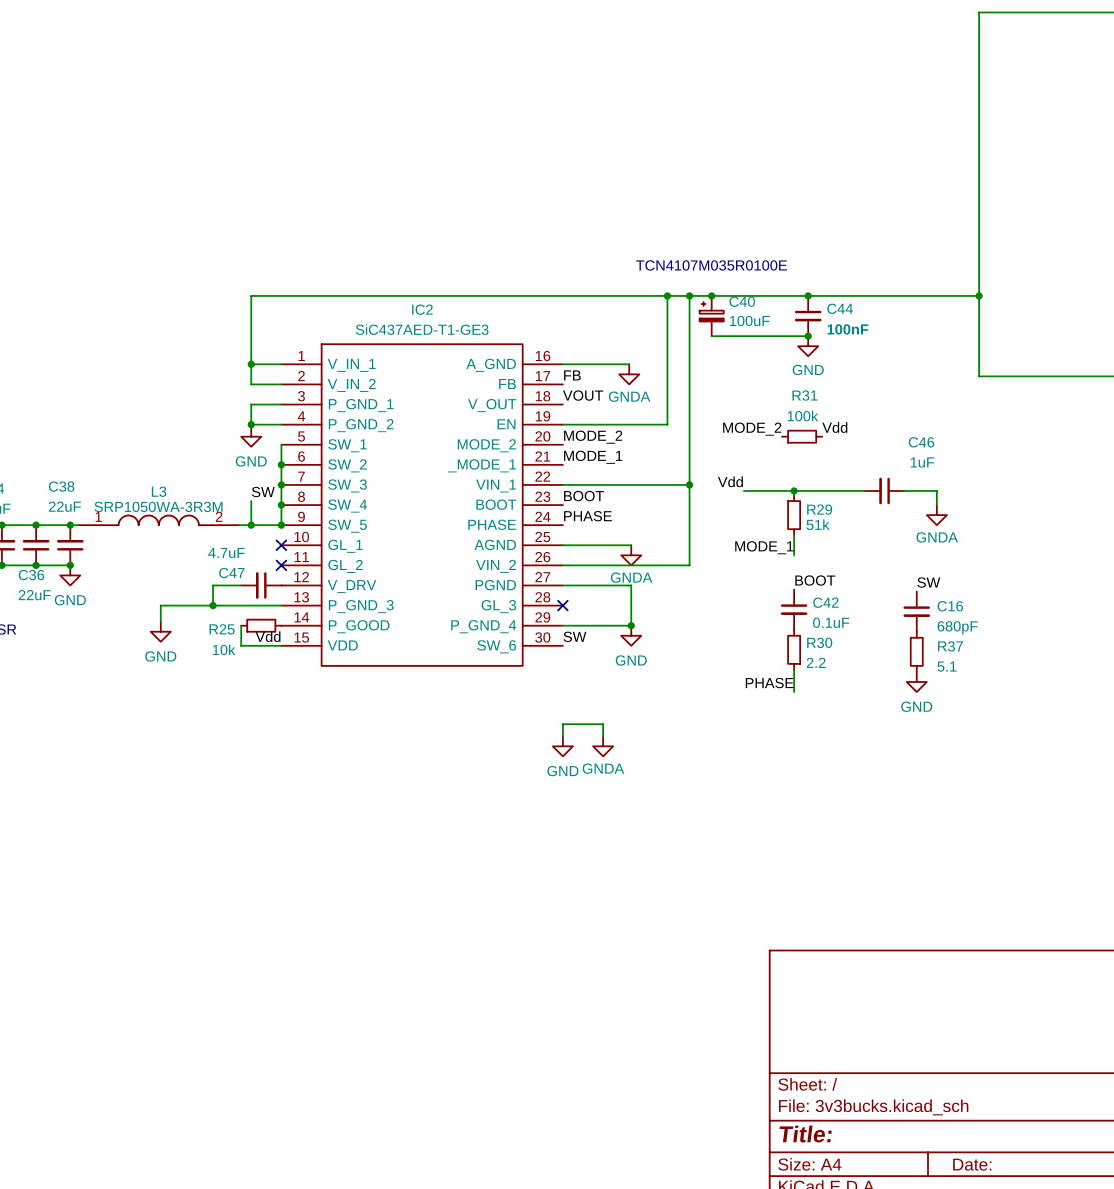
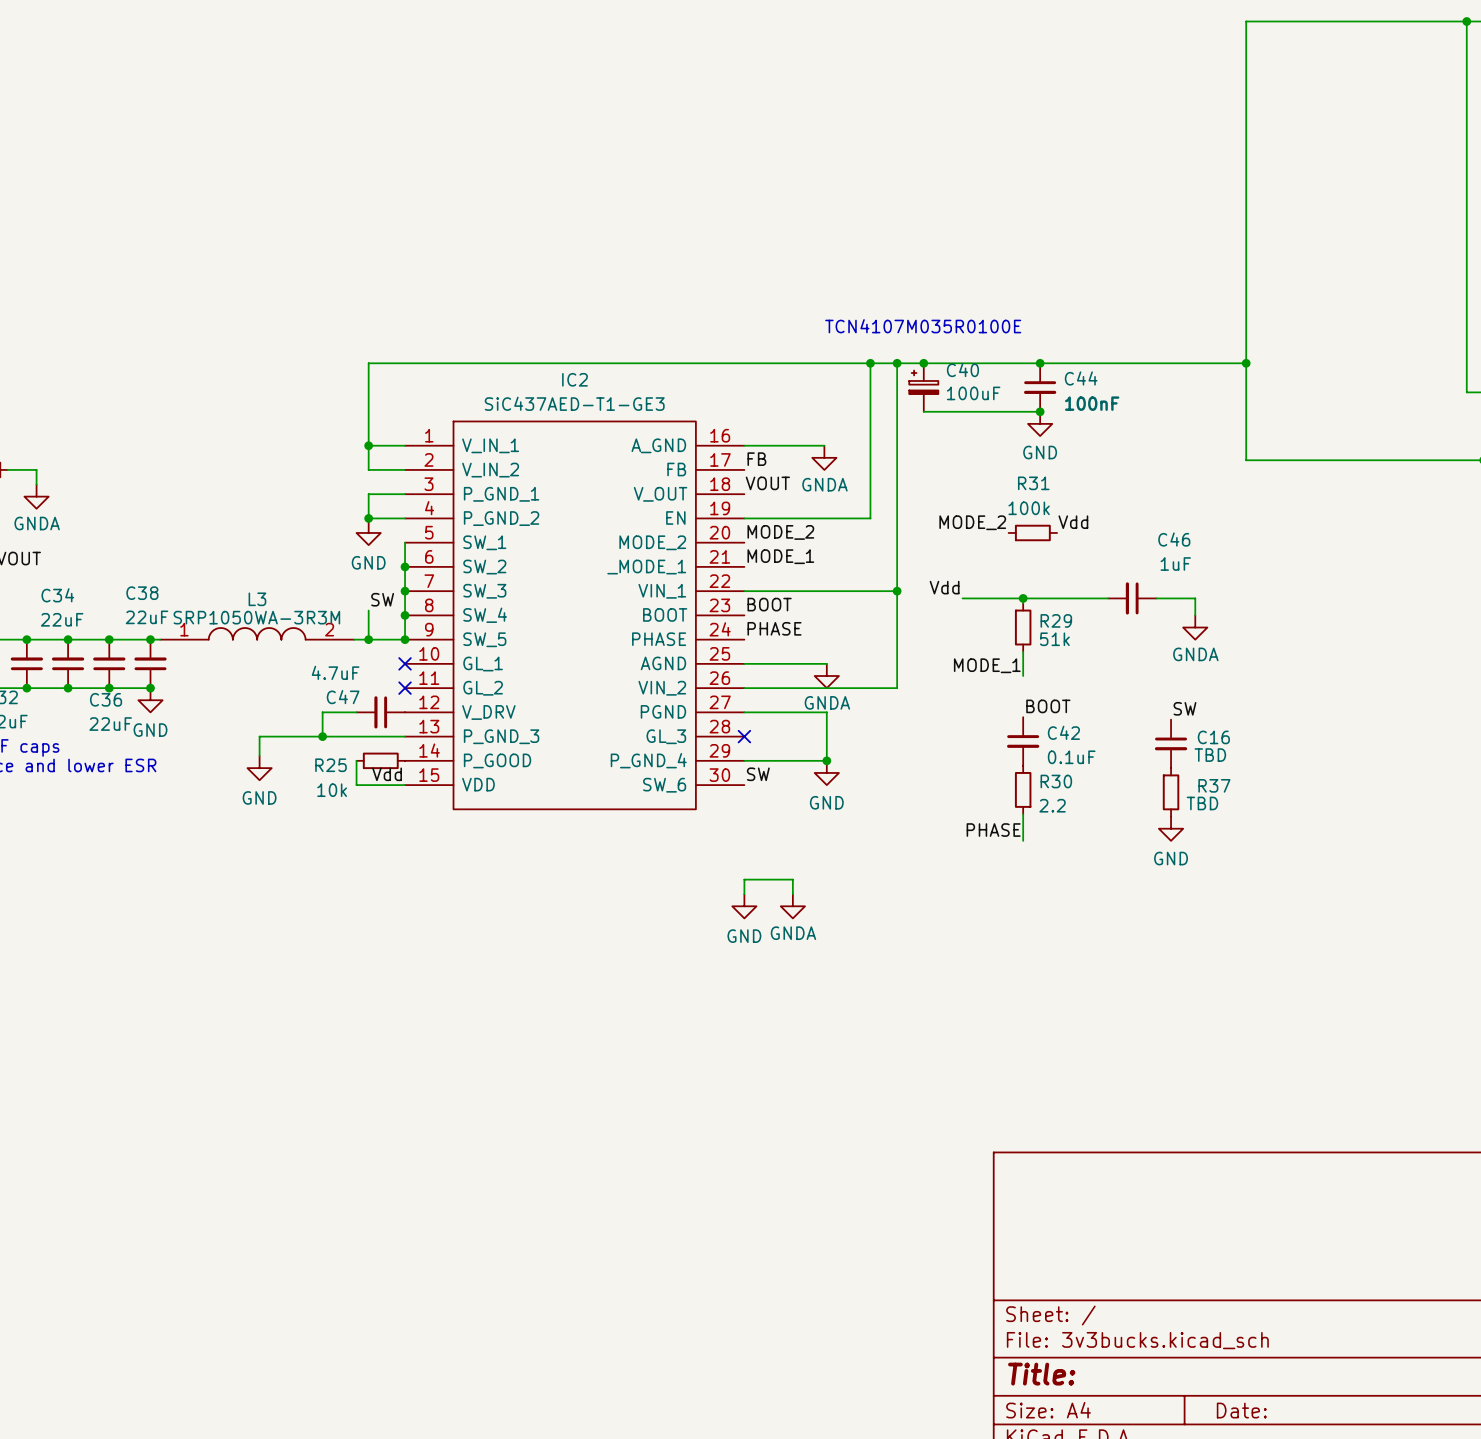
C16 value: 680pF (957, 627) -> TBD (1210, 755)
R37 value: 5.1 (946, 666) -> TBD (1202, 803)

